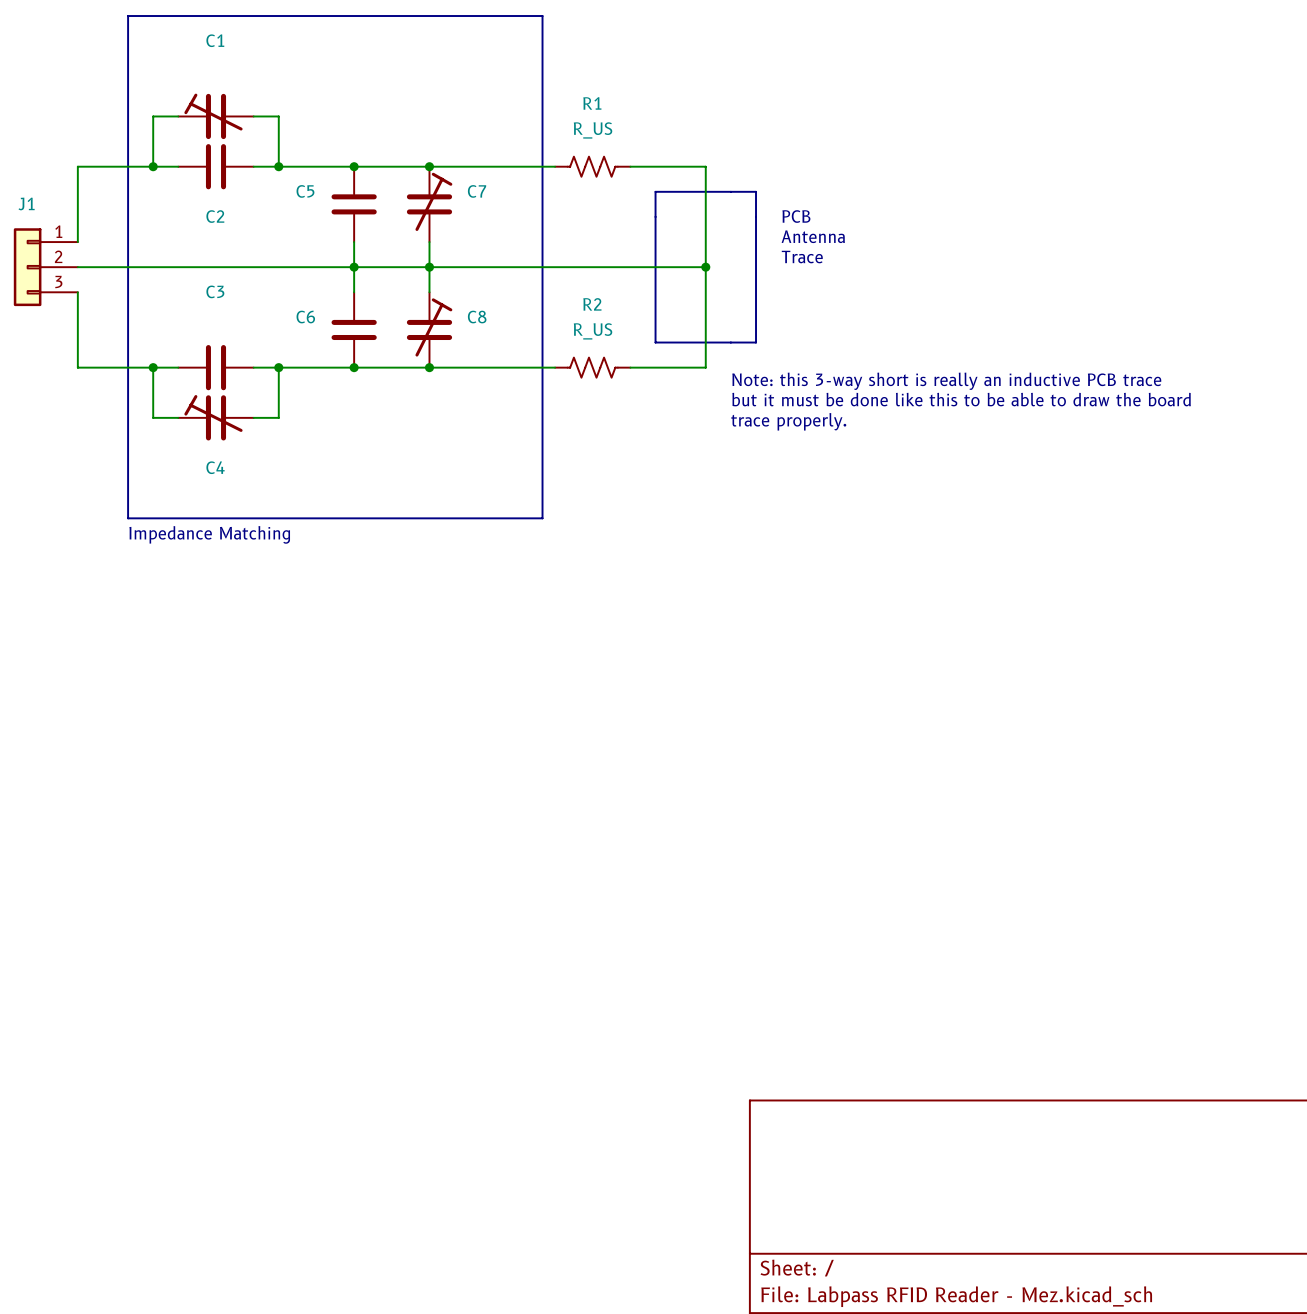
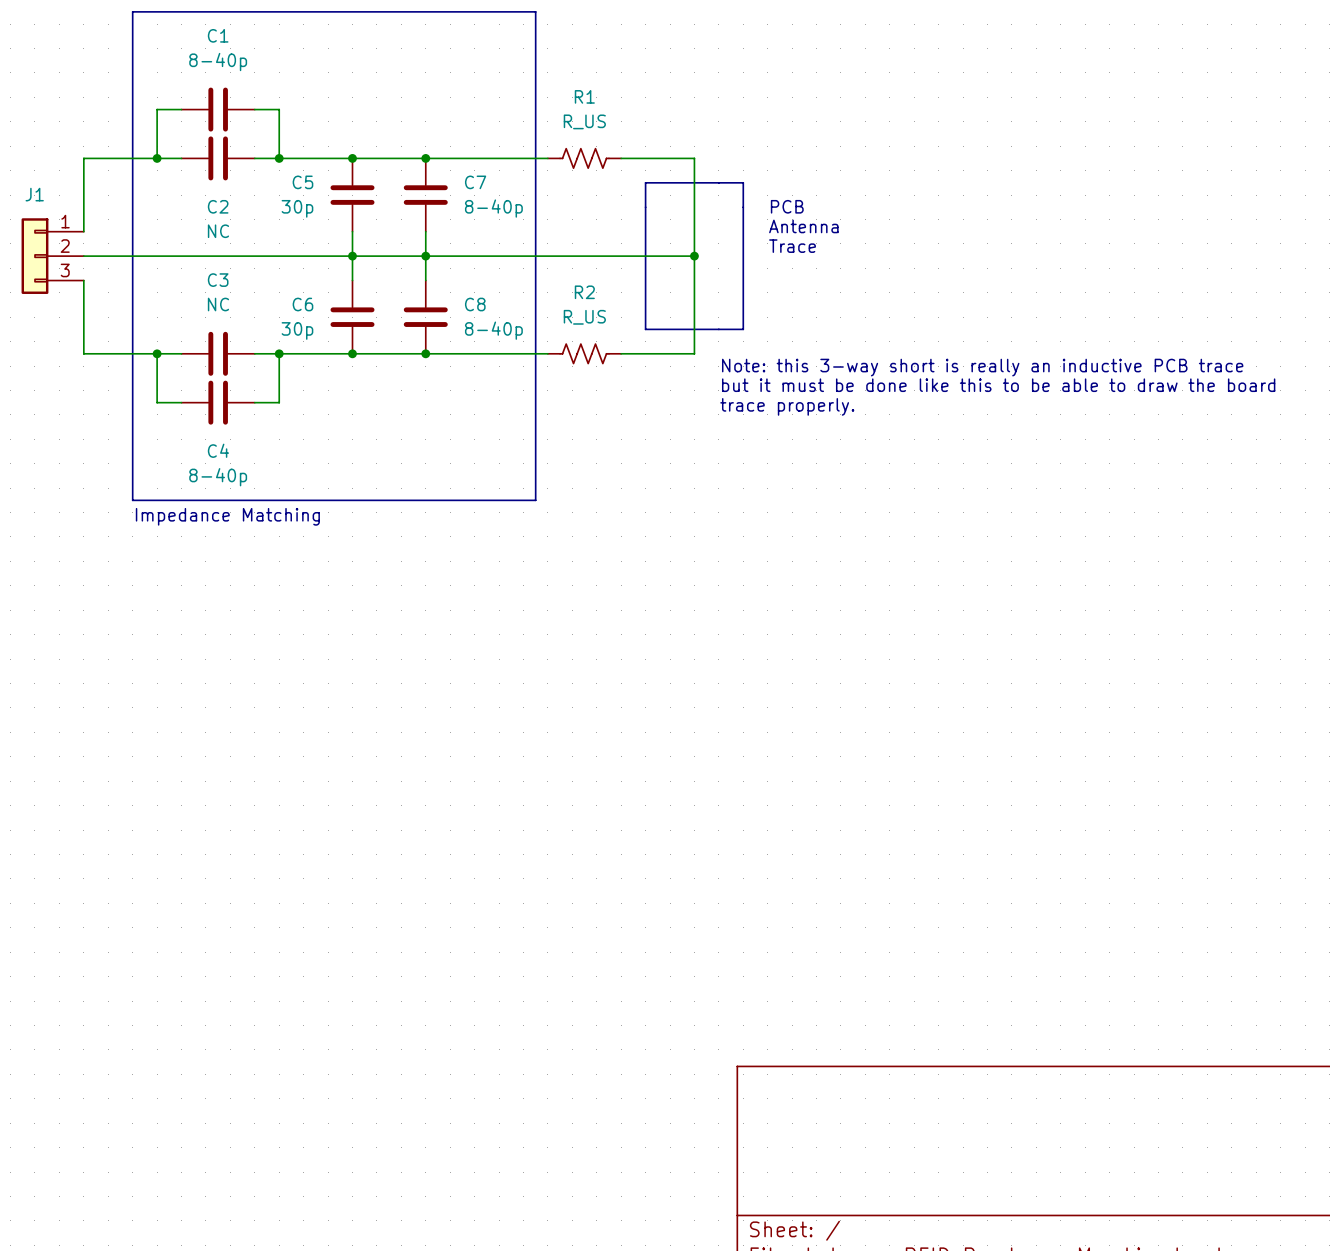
C1 value: none -> 8-40p (218, 62)
C1 symbol: [178, 93, 254, 140] -> [181, 87, 255, 132]
C7 symbol: [406, 166, 453, 243] -> [403, 158, 448, 232]
C5 value: none -> 30p (297, 208)
C7 value: none -> 8-40p (493, 208)
C2 value: none -> NC (218, 231)
C8 symbol: [406, 292, 453, 368] -> [403, 280, 448, 354]
C3 value: none -> NC (218, 304)
C6 value: none -> 30p (297, 330)
C8 value: none -> 8-40p (493, 330)
C4 symbol: [178, 395, 254, 441] -> [181, 380, 255, 425]
C4 value: none -> 8-40p (218, 477)

